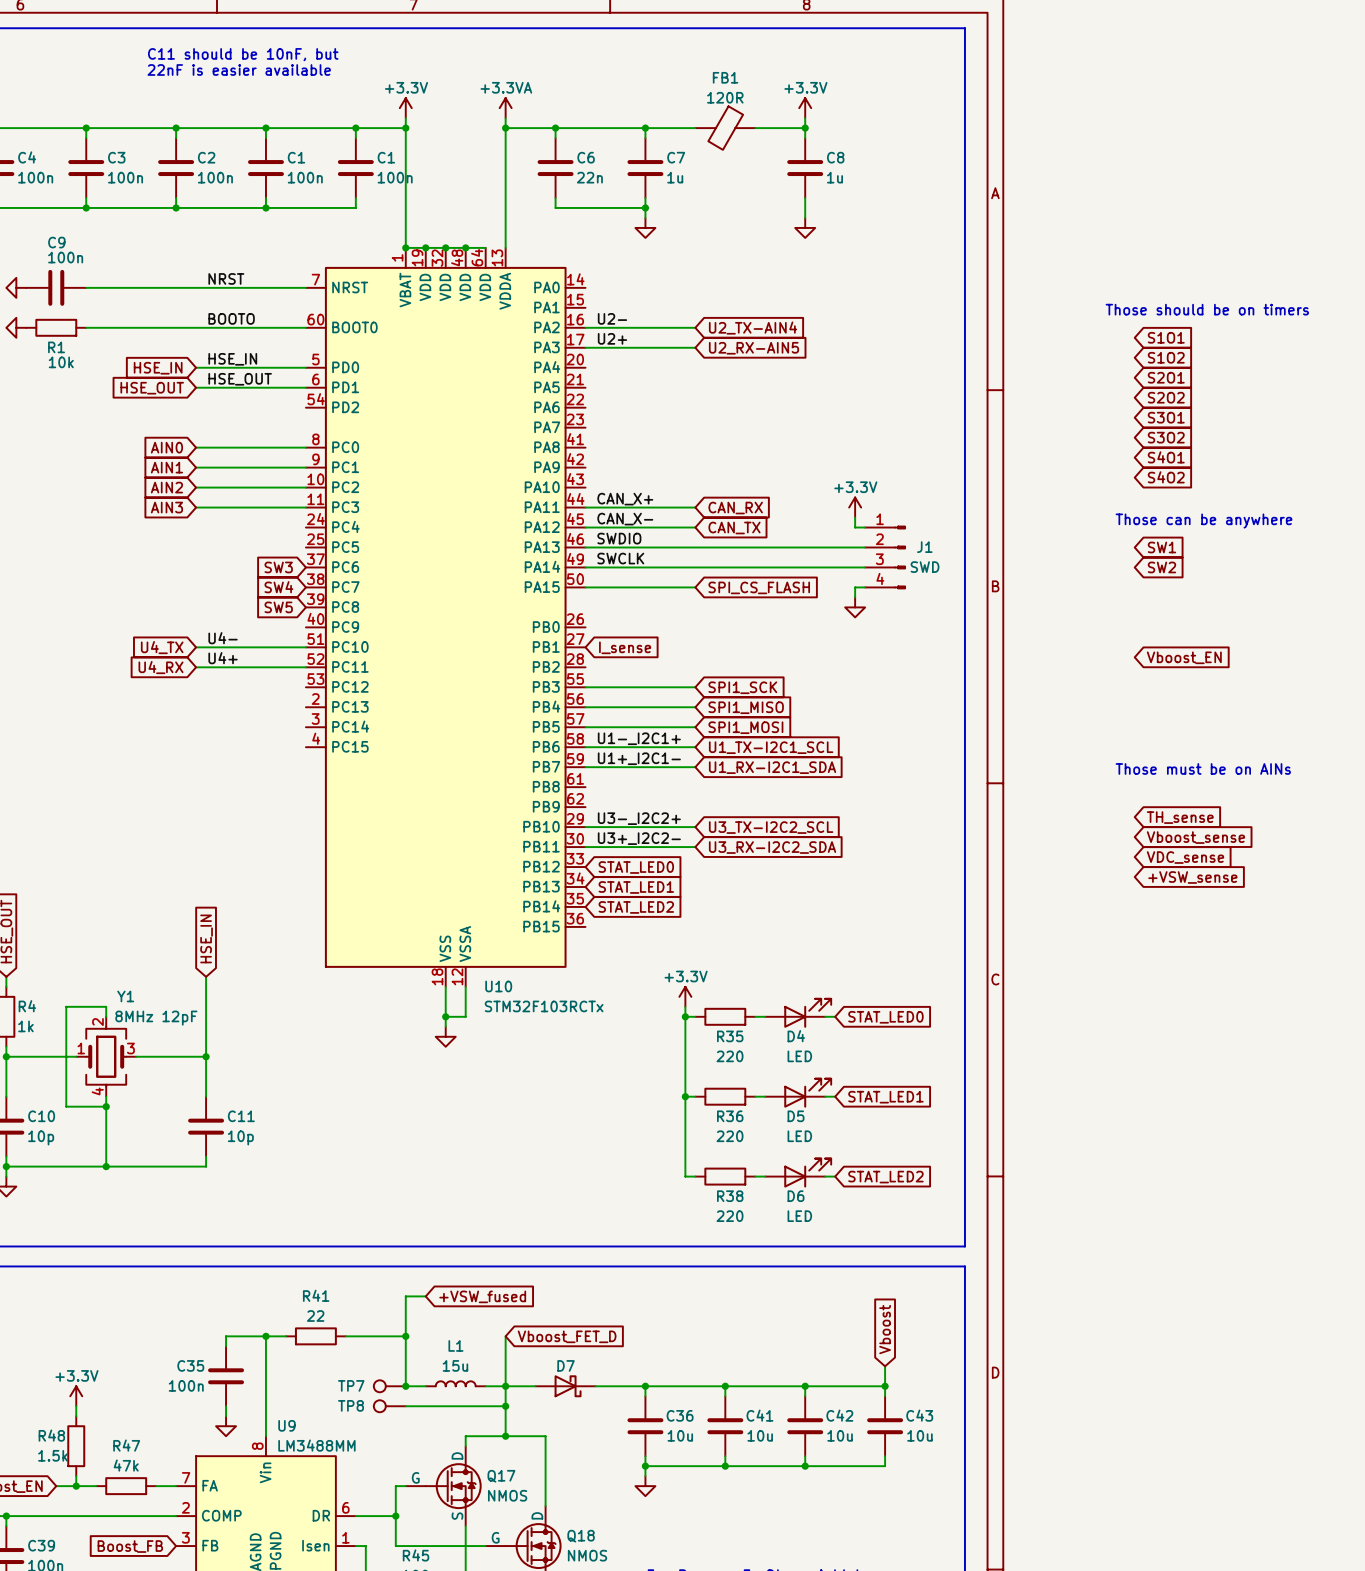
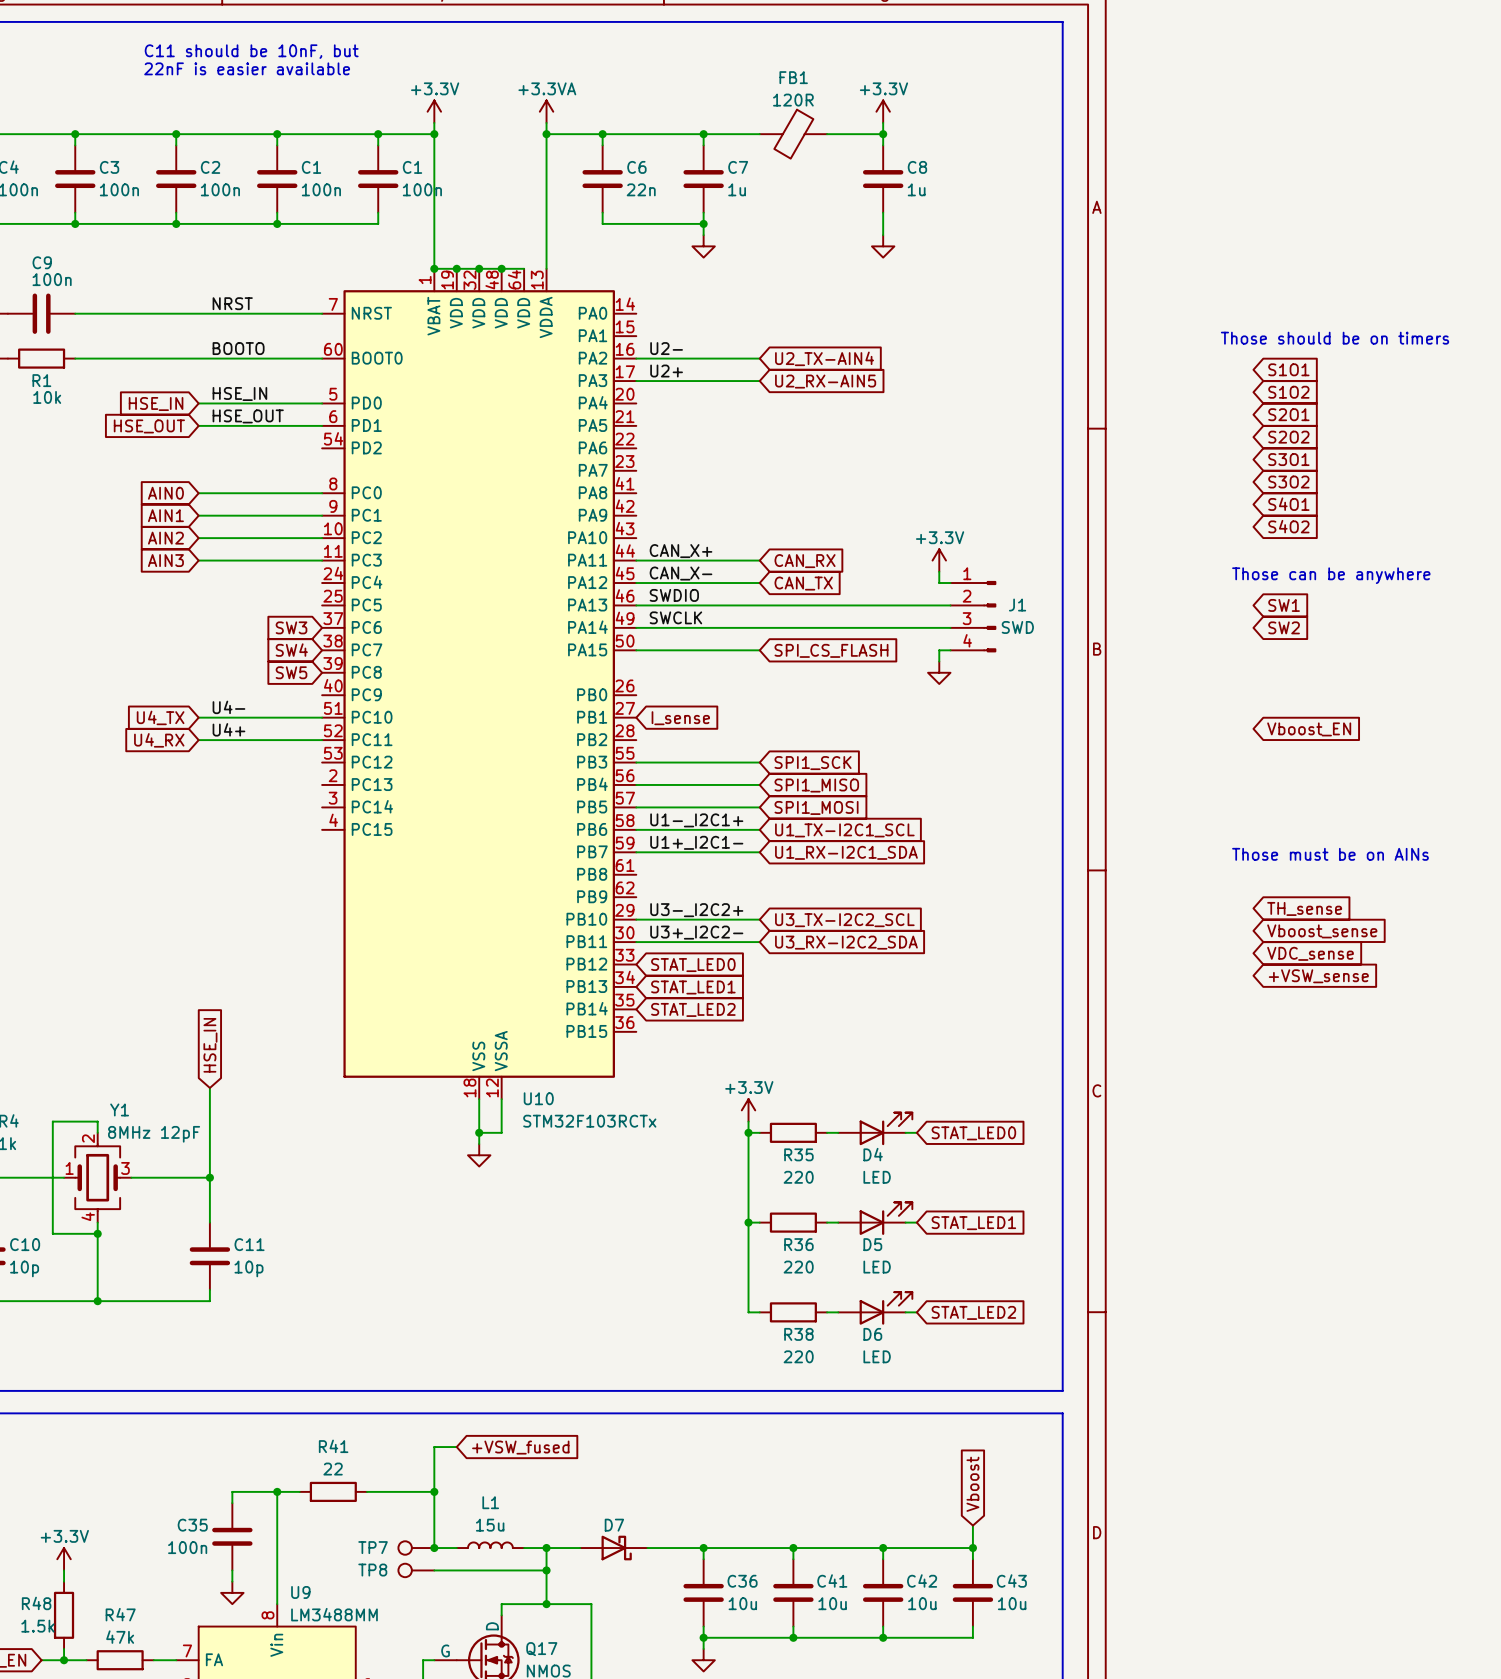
wire: (505, 1336) (505, 1386) -> none
global label: Vboost_FET_D (567, 1336) -> none

